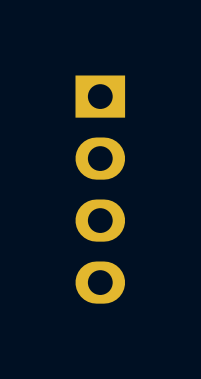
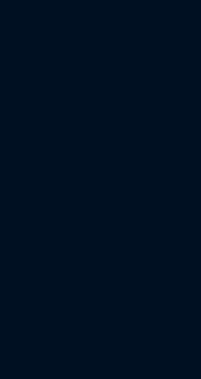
part: (100, 189) -> none

